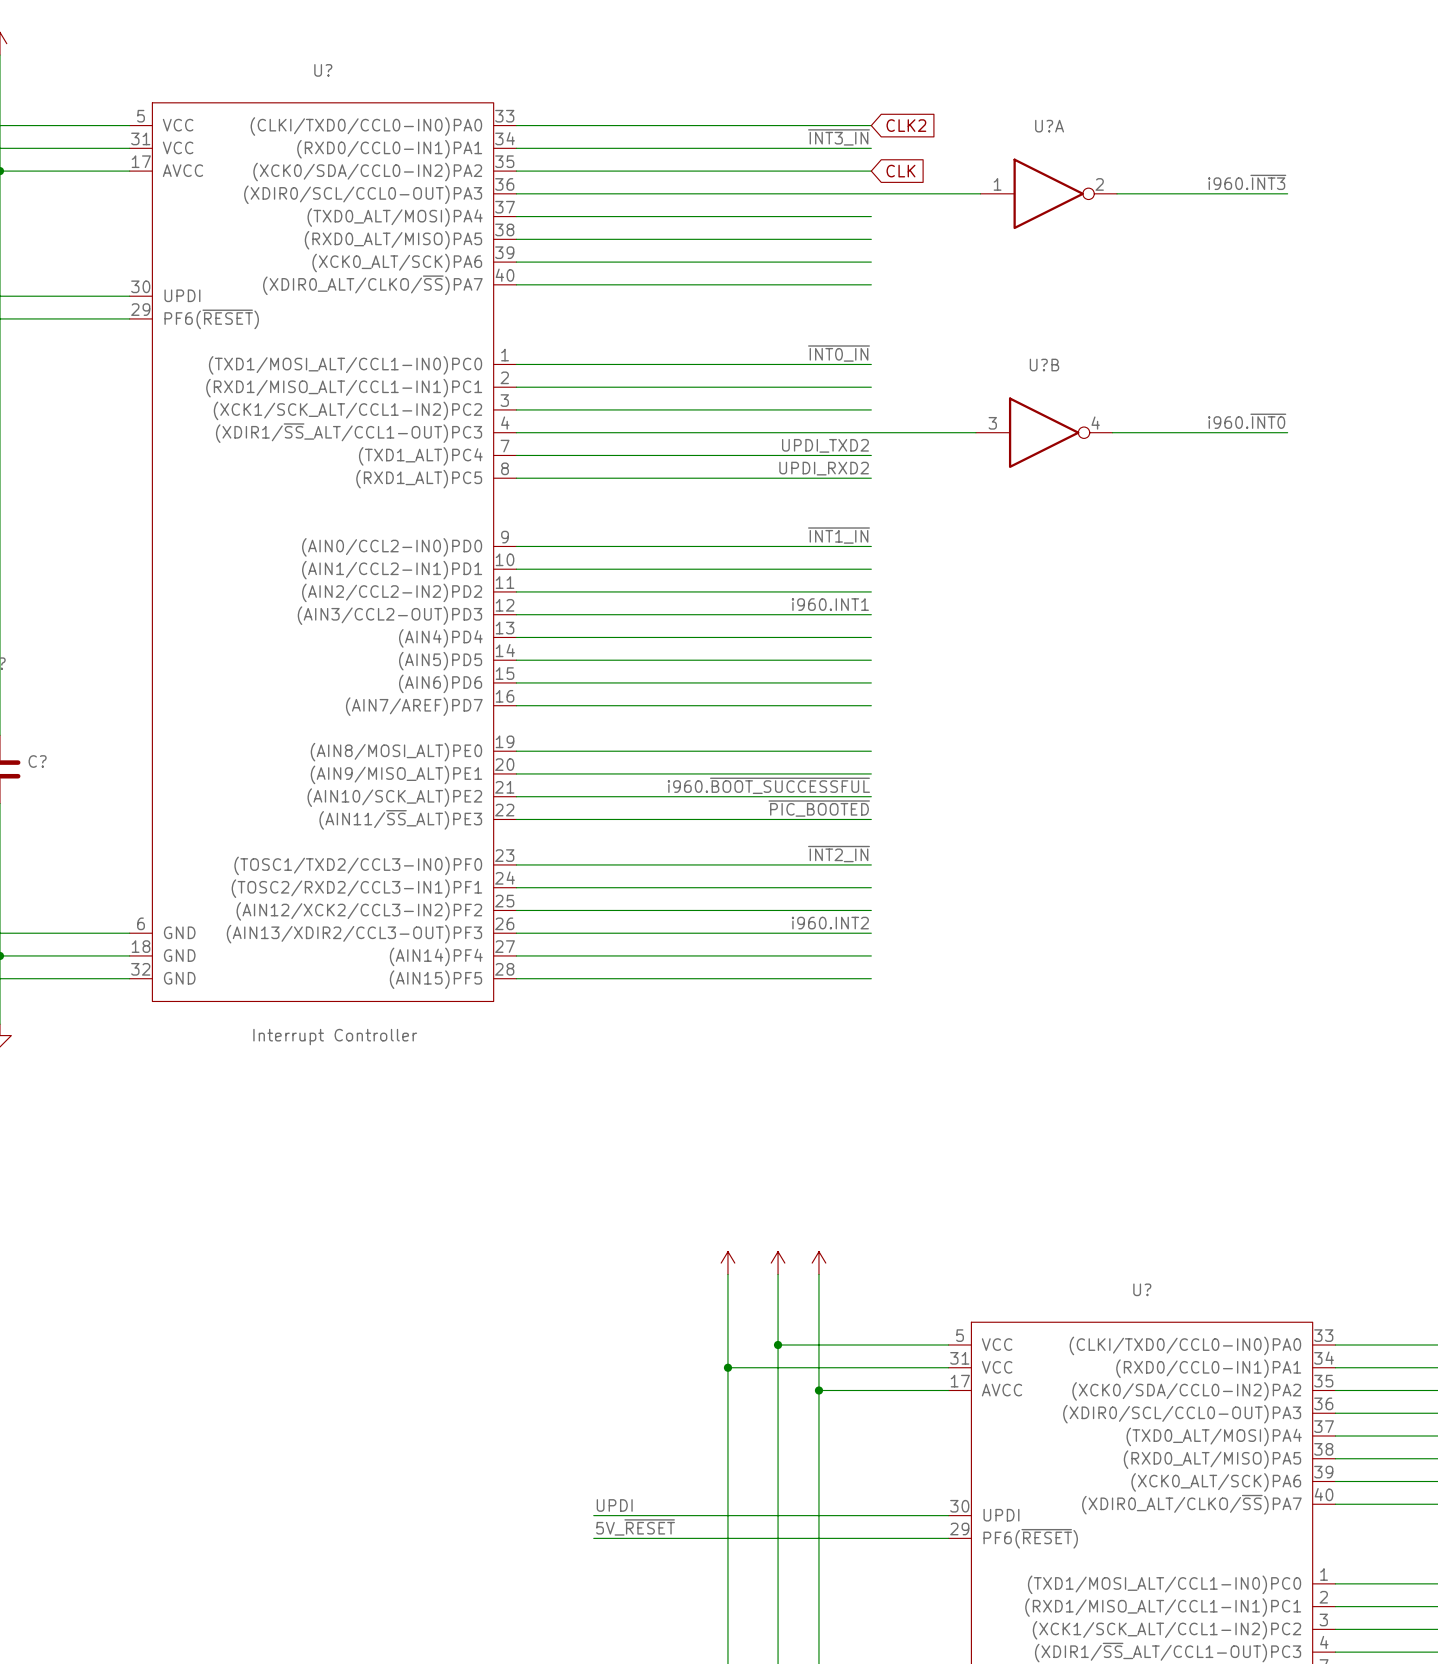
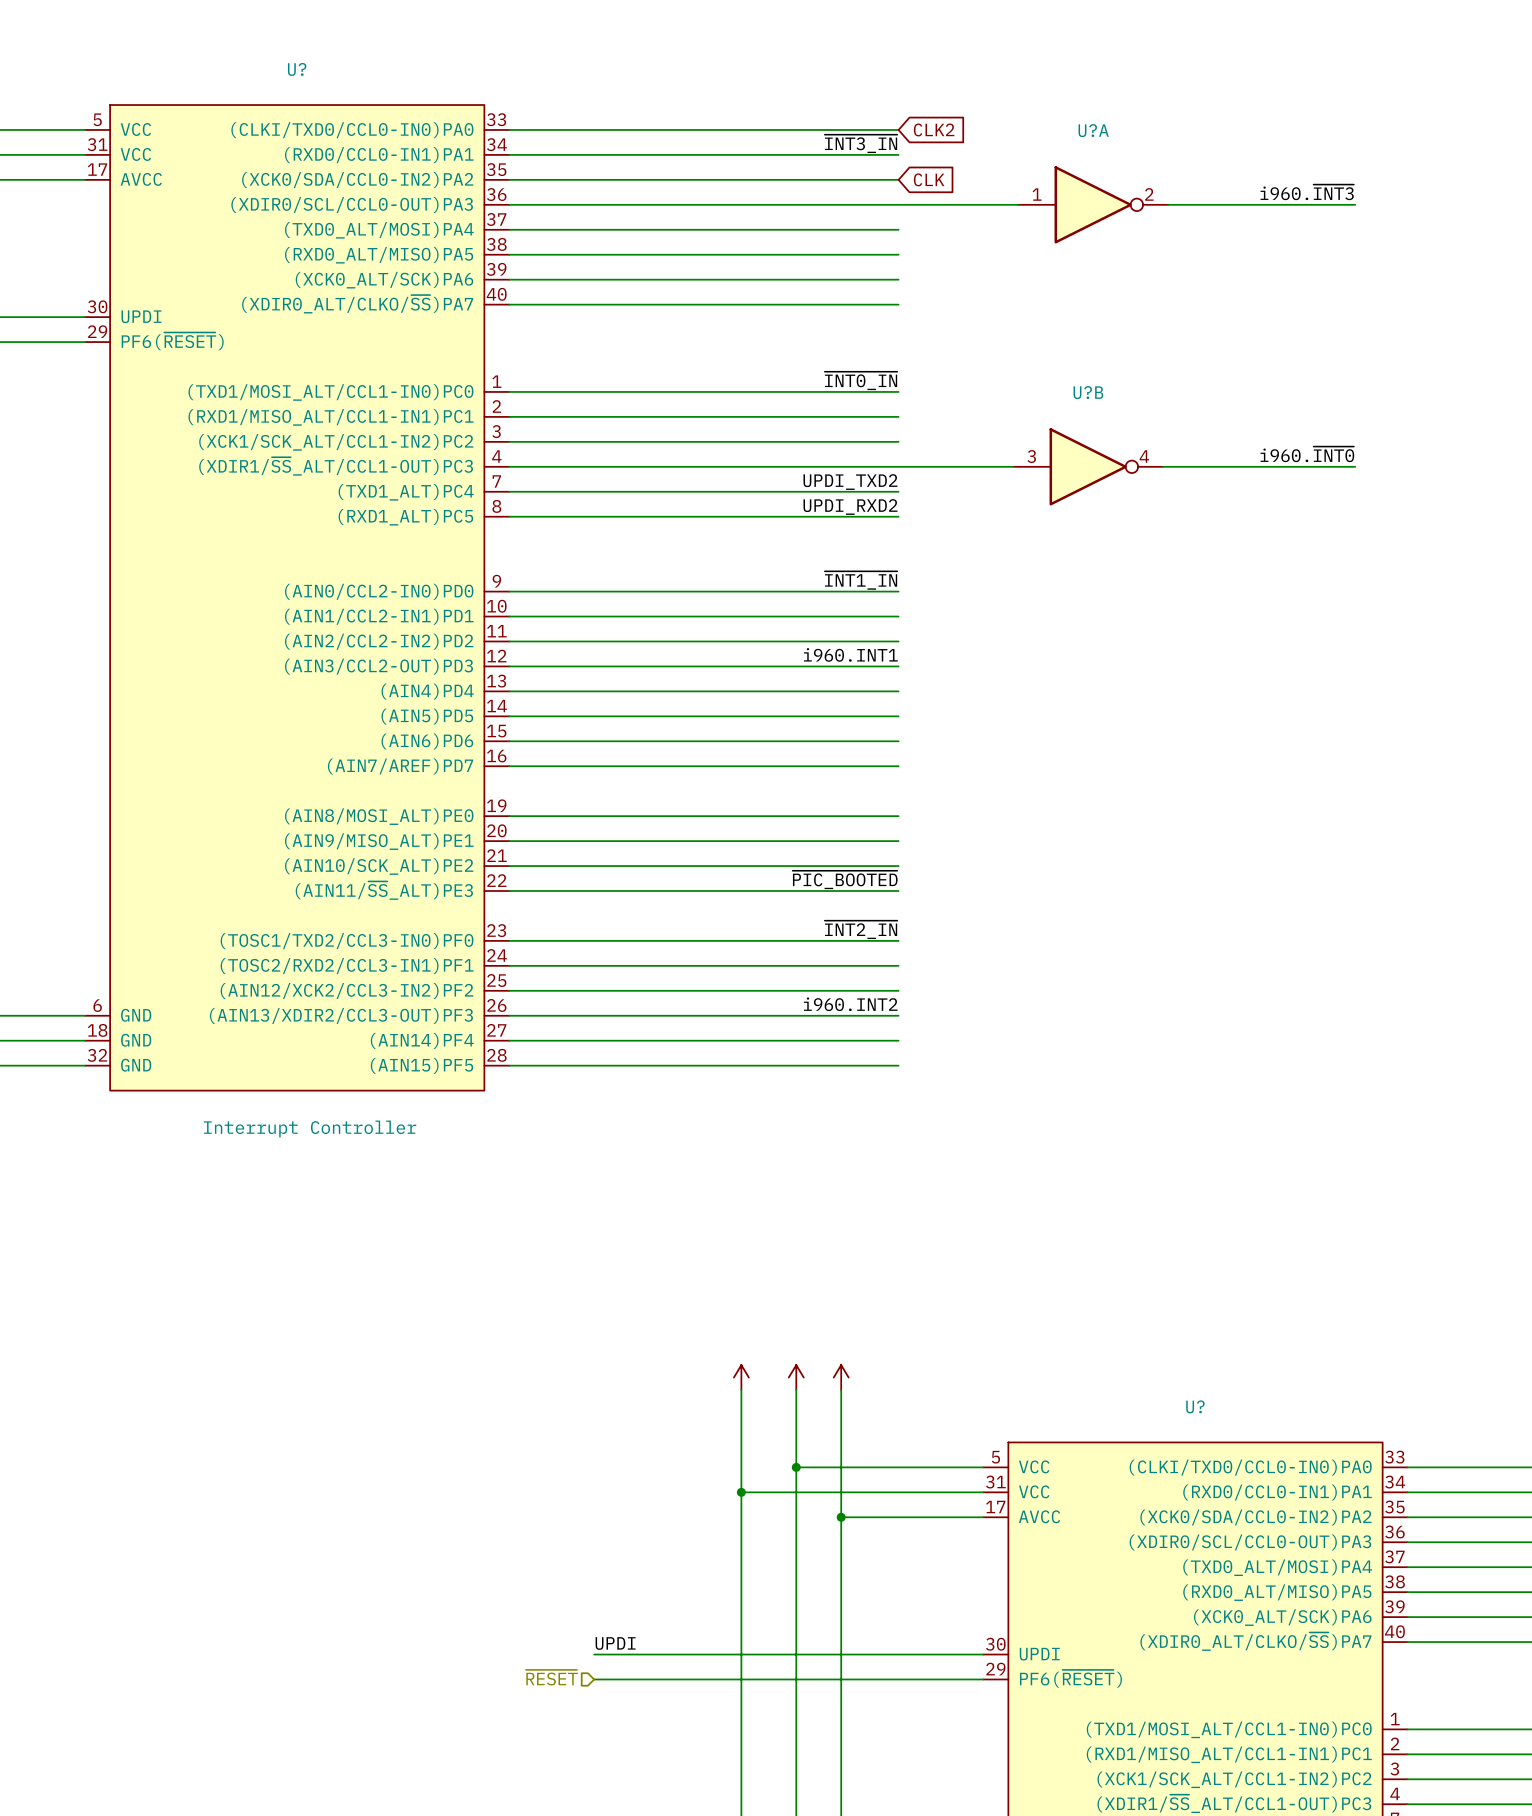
label: i960.~{BOOT_SUCCESSFUL} (768, 785) -> none
label: 5V_~{RESET} (635, 1527) -> none
hierarchical label: none -> ~{RESET} (551, 1677)

